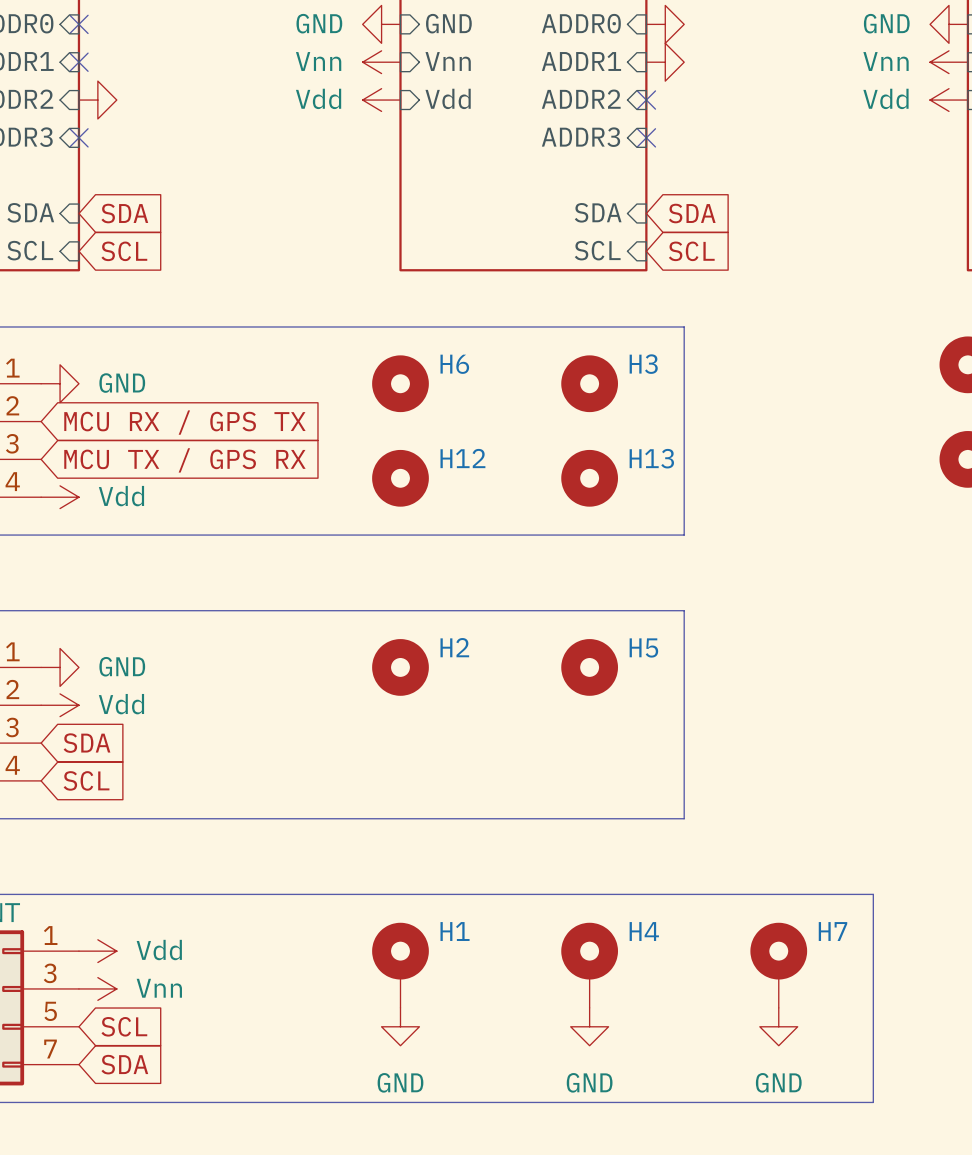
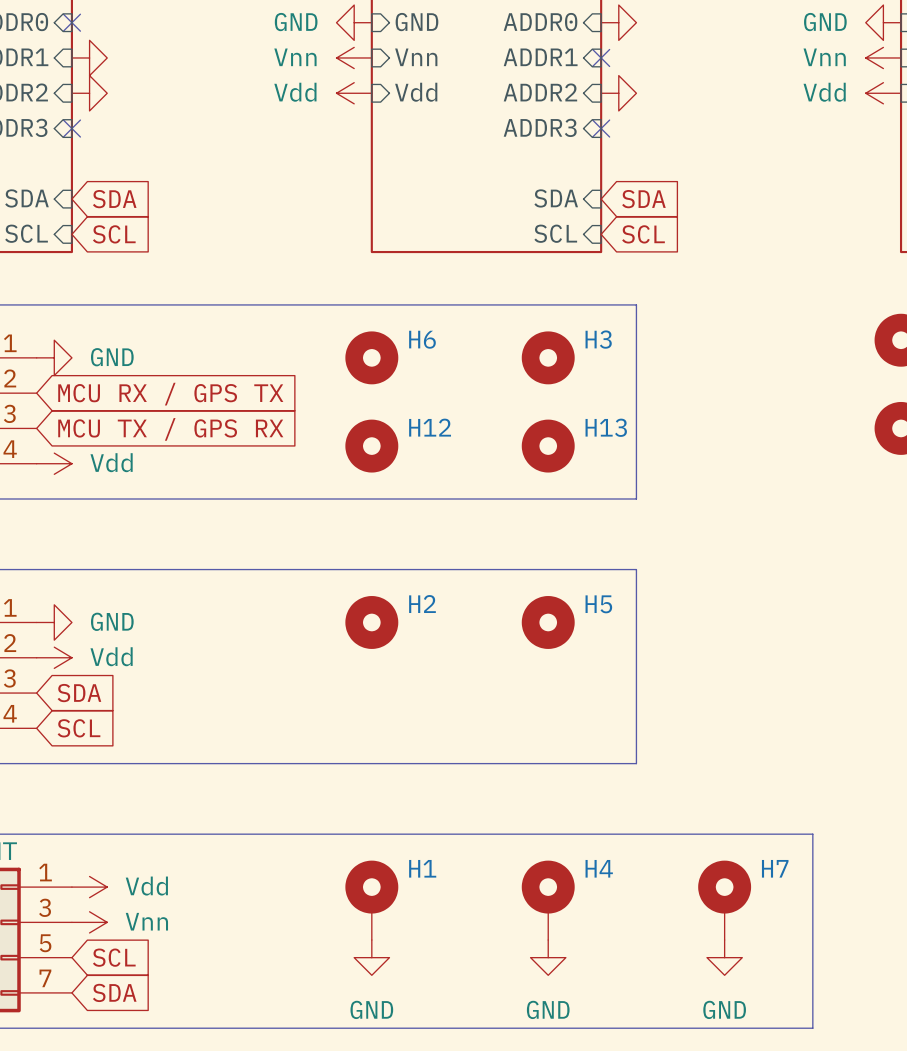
no-connect mark: (78, 62) -> none
power symbol: none -> (89, 57)
power symbol position: (665, 62) -> (618, 93)
no-connect mark position: (646, 100) -> (601, 57)

